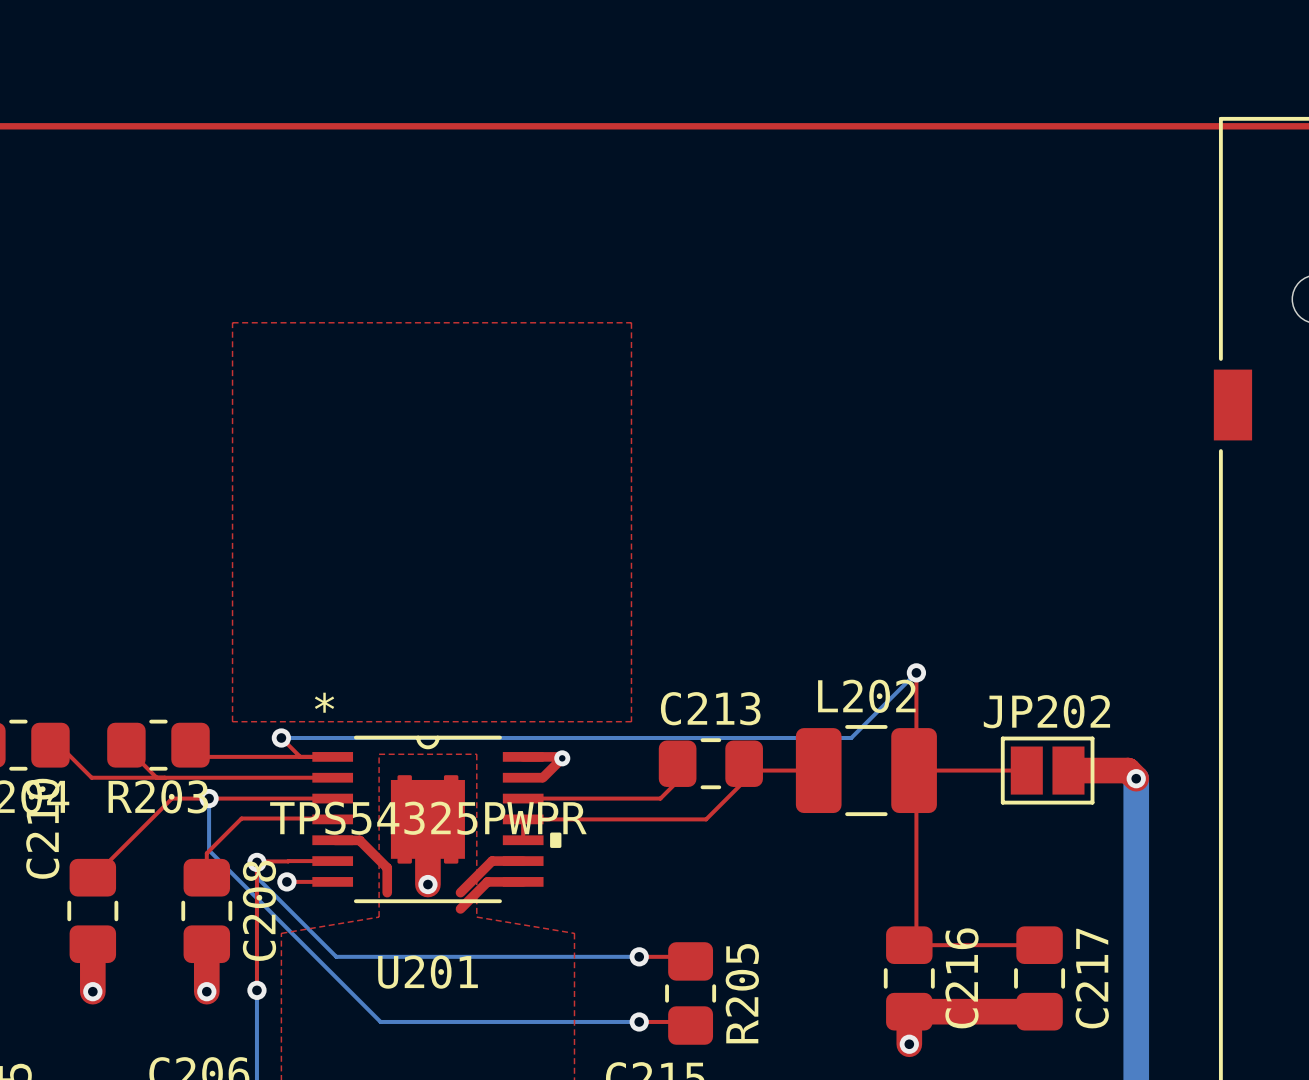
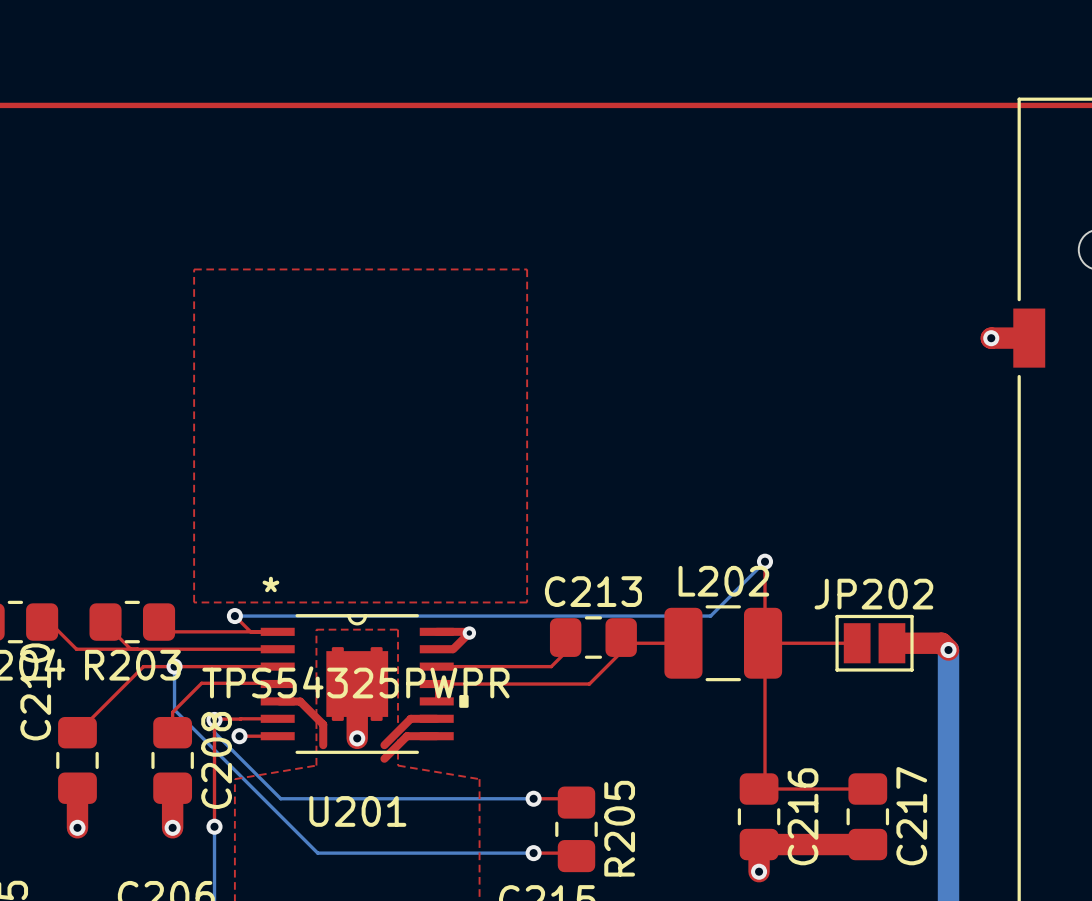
top track: none -> (991, 338) (1029, 338)
via: none -> (991, 338)

